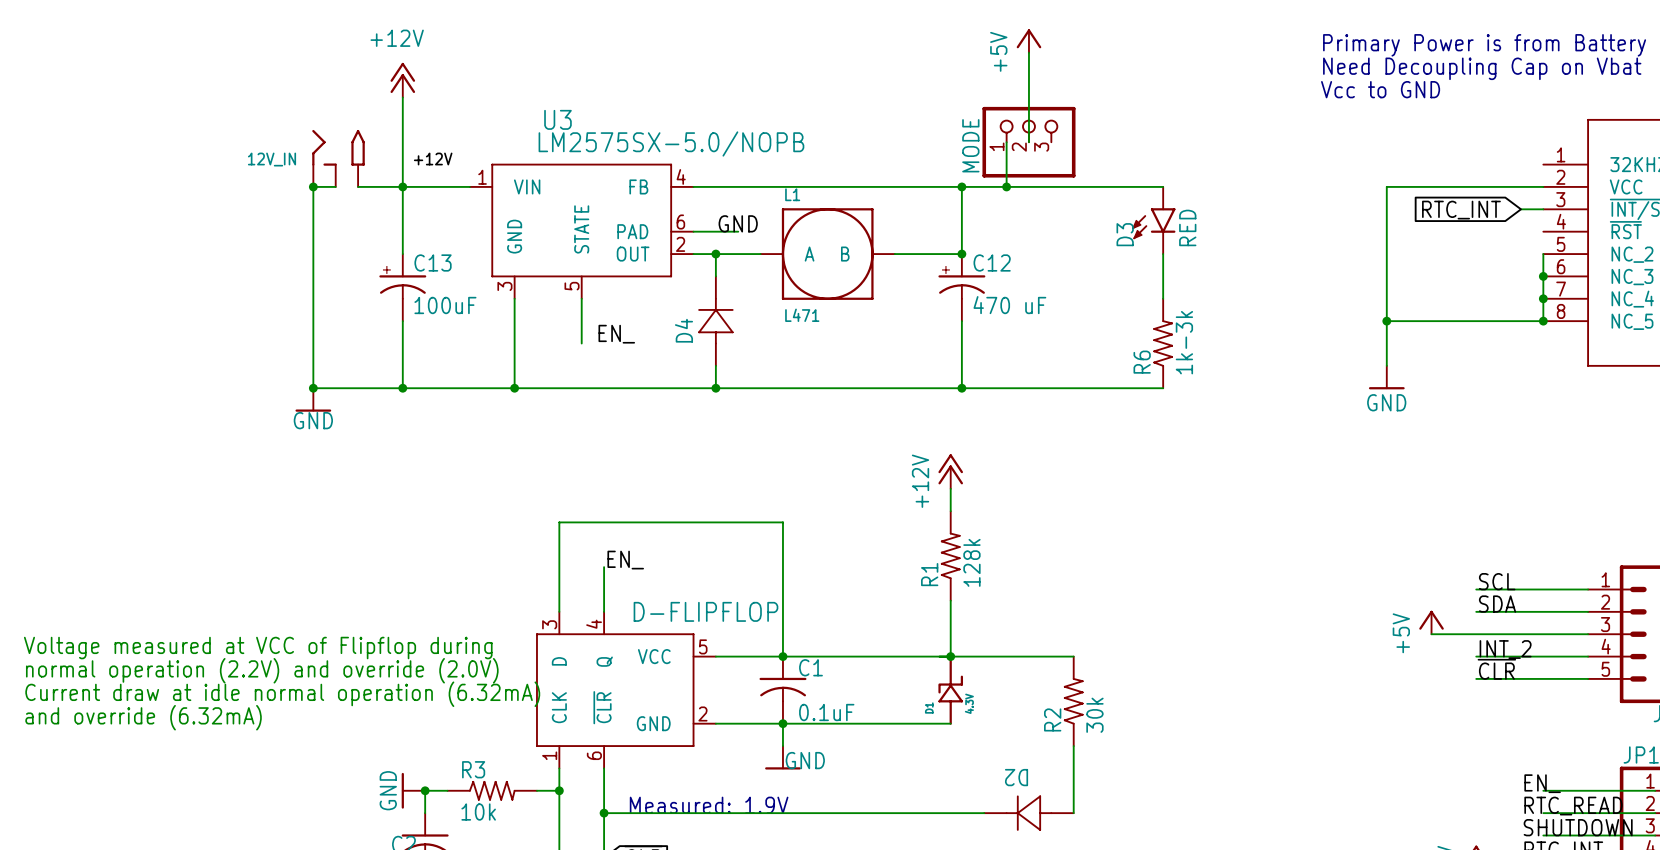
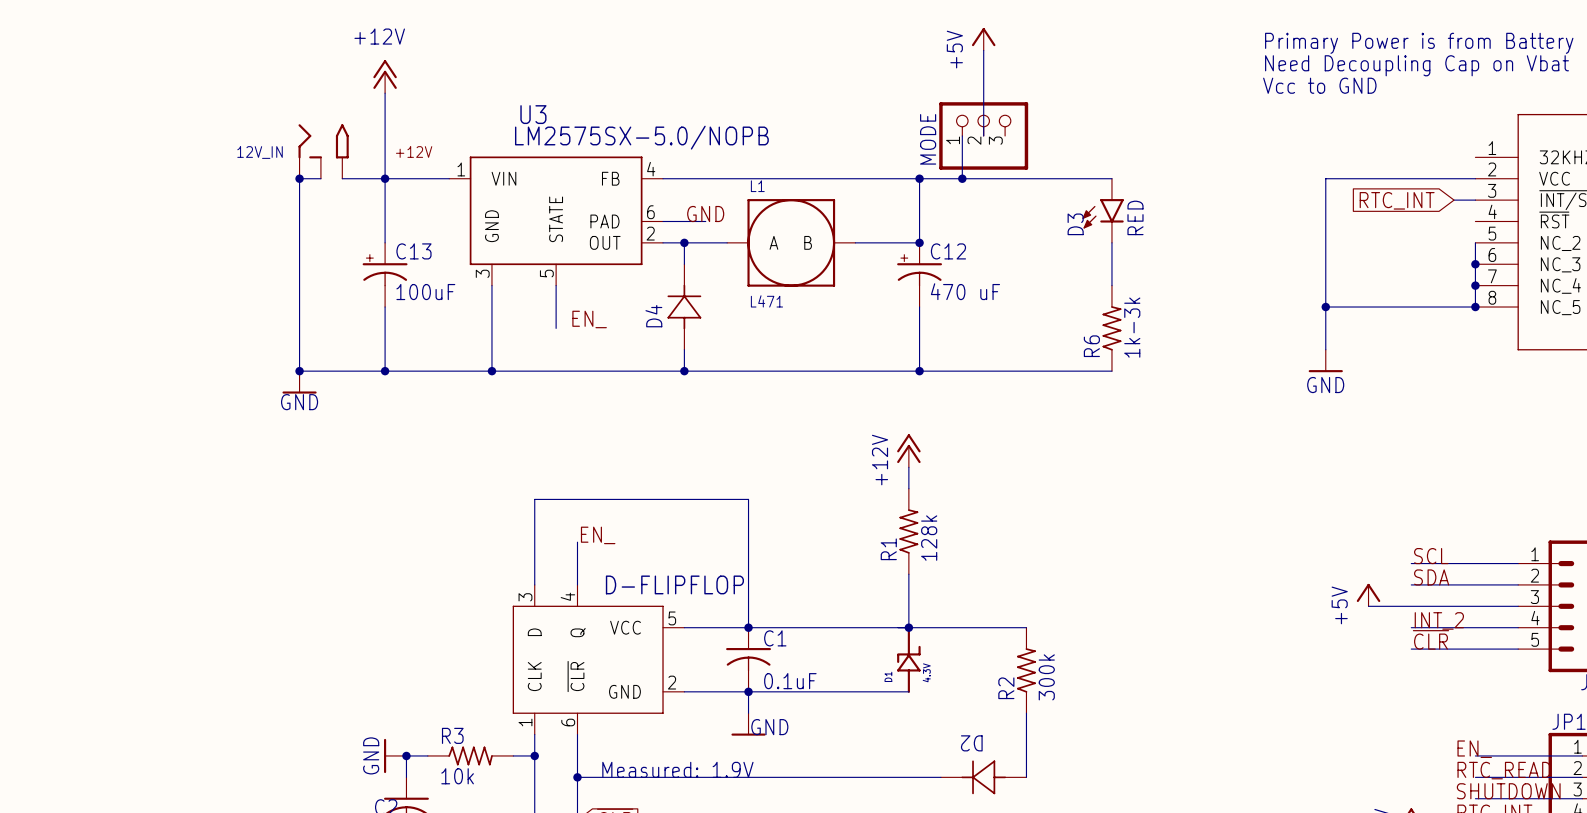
text: Voltage measured at VCC of Flipflop during (258, 648) -> none
text: normal operation (2.2V) and override (2.0V) (262, 670) -> none
text: Current draw at idle normal operation (6.32mA) (282, 694) -> none
R2 value: 30k (1094, 715) -> 300k (1046, 677)
text: and override (6.32mA) (143, 717) -> none

